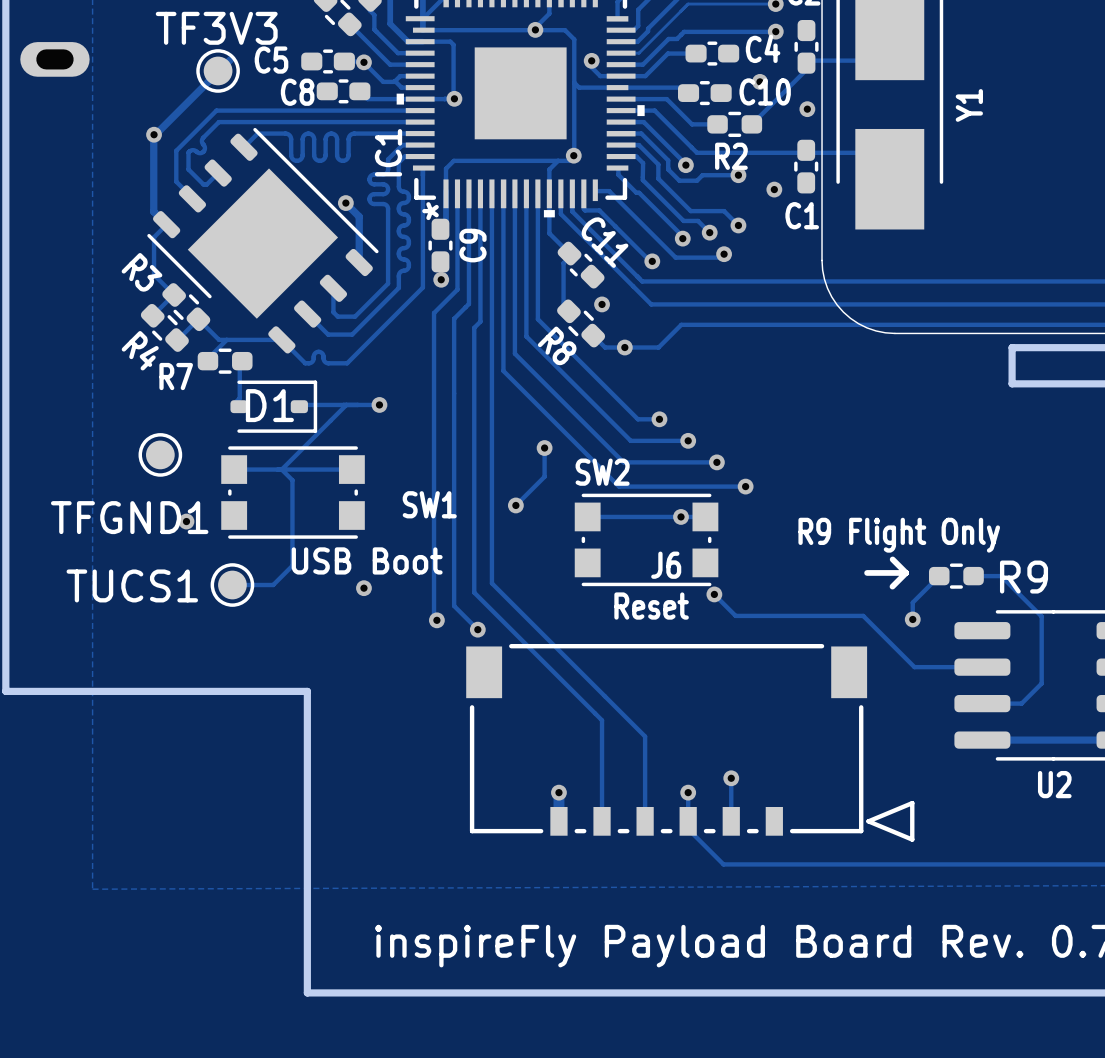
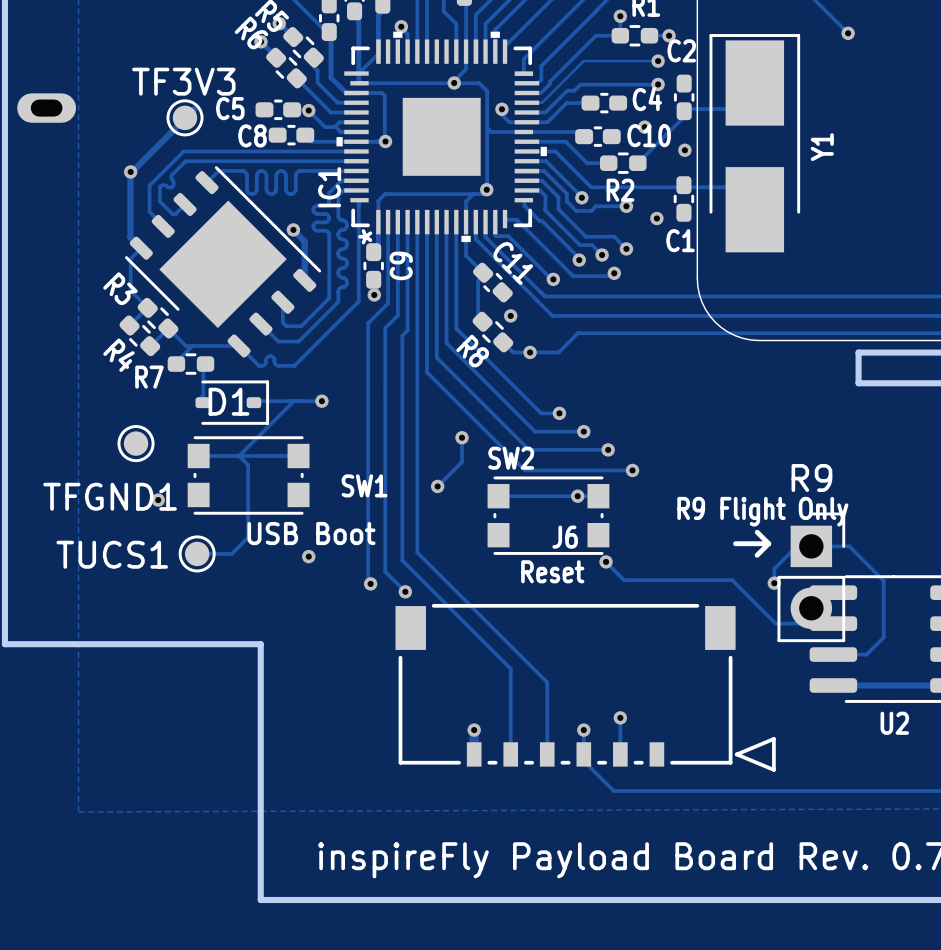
R9 footprint: [928, 563, 984, 589] -> [777, 512, 846, 643]
R9 name position: R9 (1024, 577) -> R9 (811, 477)

